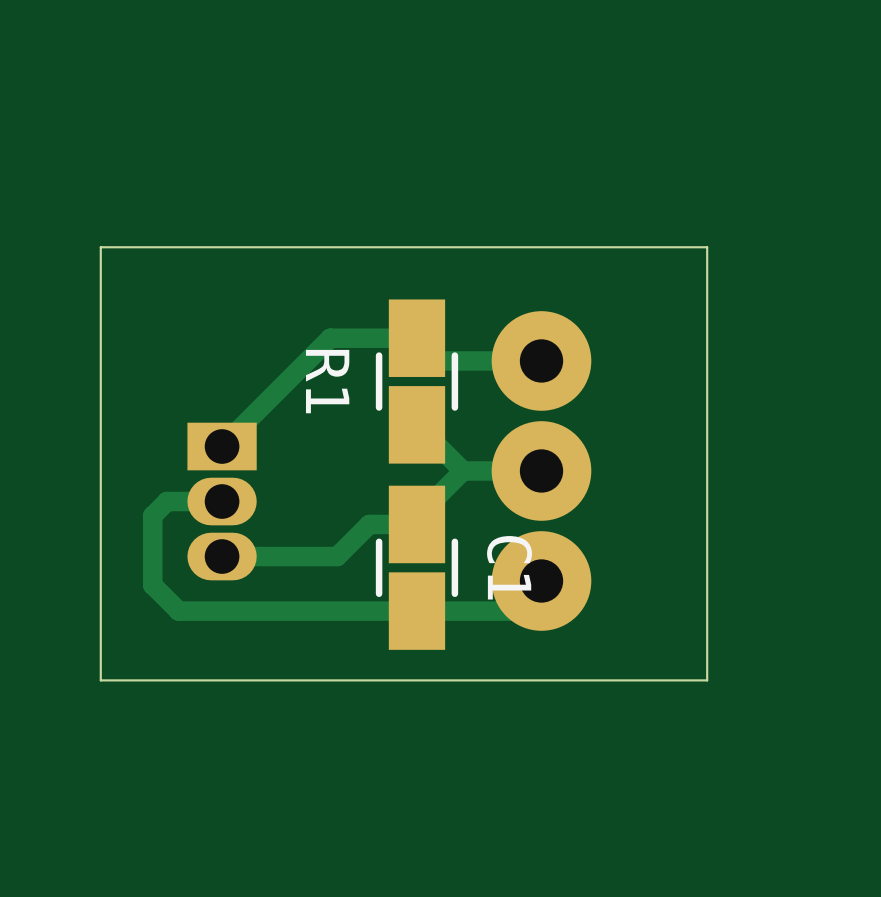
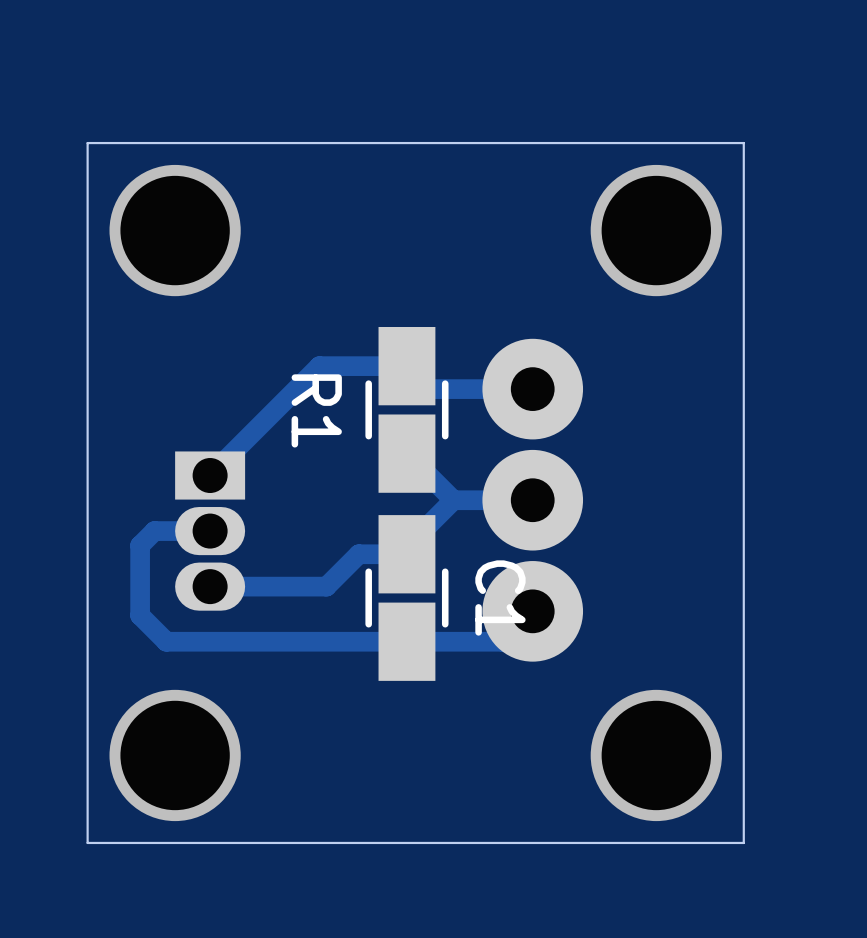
via: none -> (175, 230)
via: none -> (656, 230)
board edge: (100, 247) (707, 247) (707, 680) (100, 680) -> (87, 274) (87, 143) (743, 143) (743, 842) (87, 842) (87, 711)
via: none -> (175, 755)
via: none -> (656, 755)

